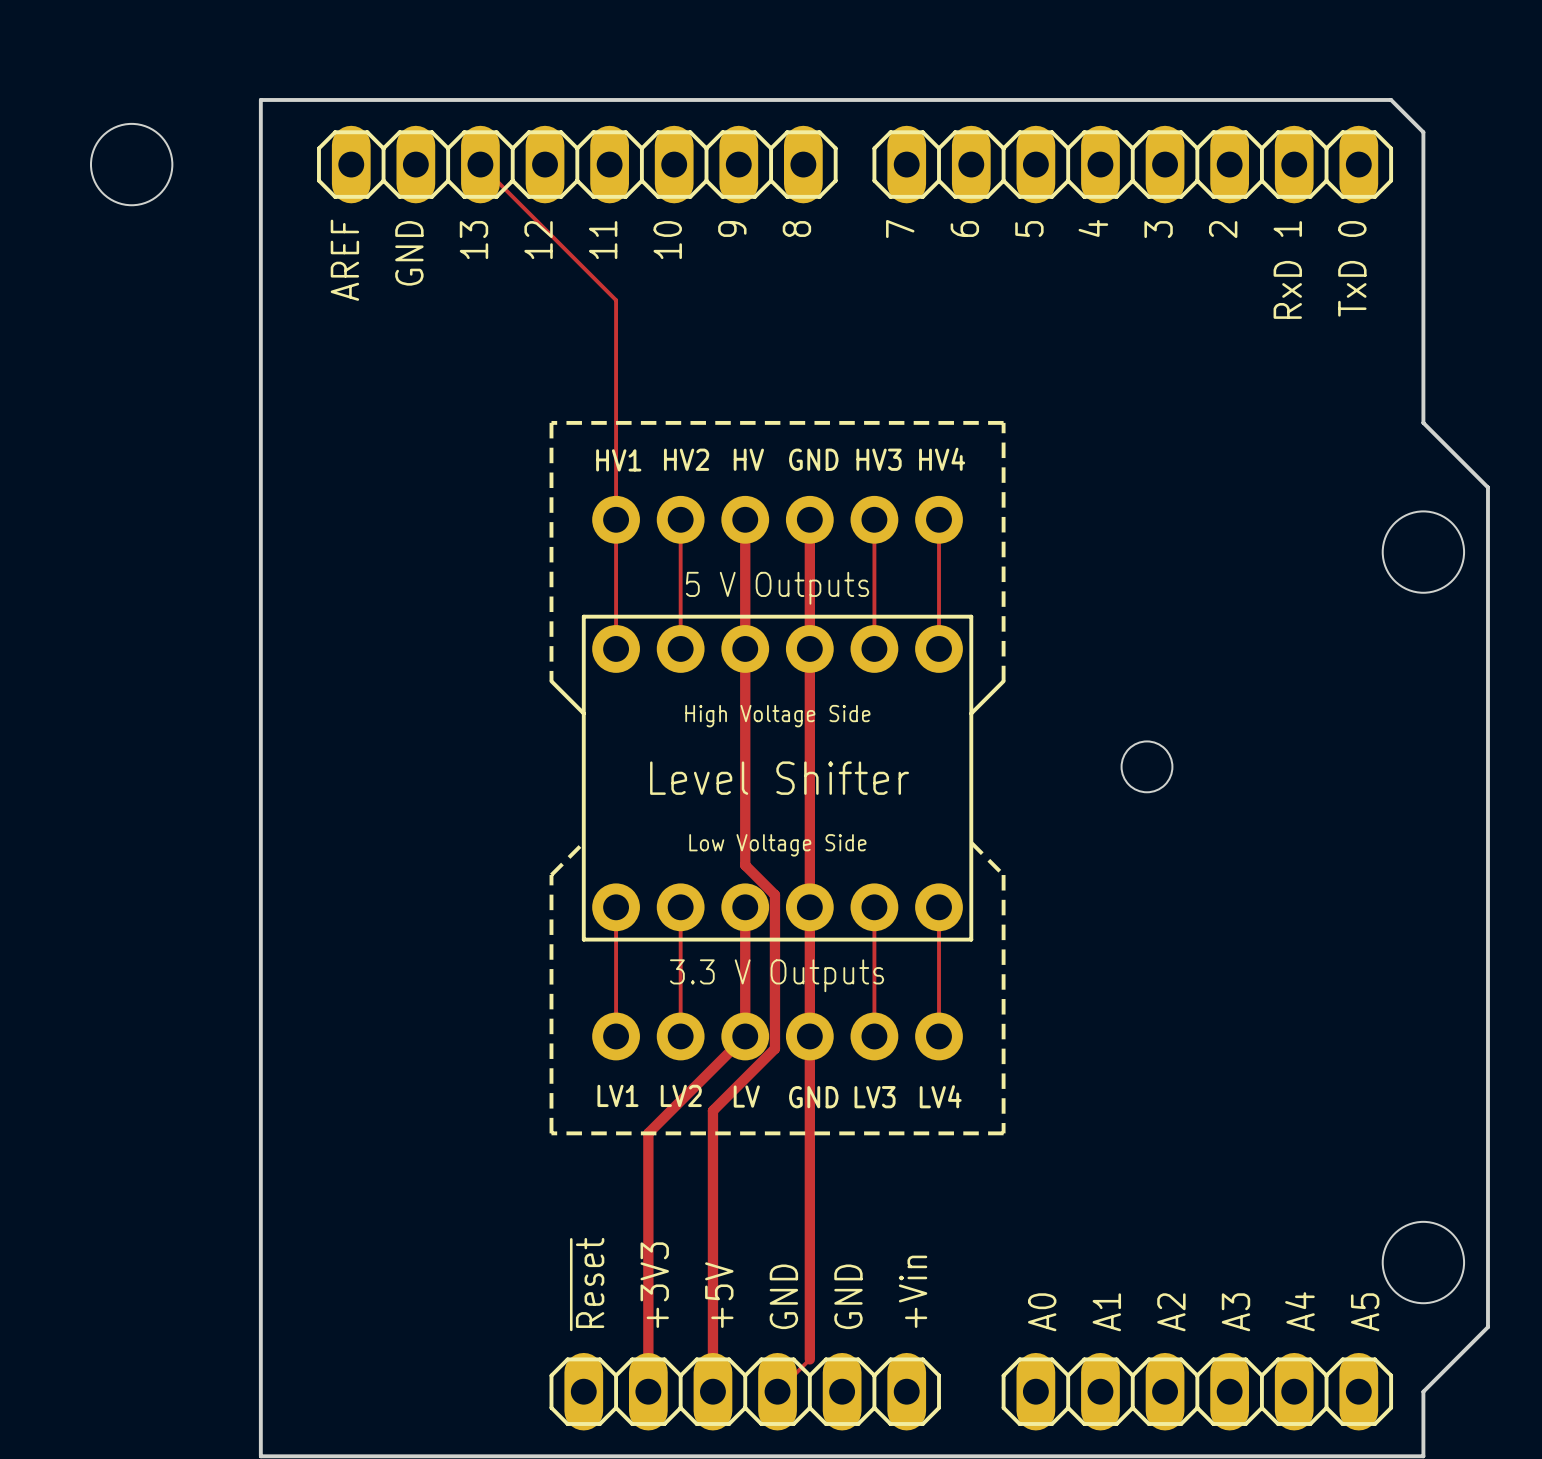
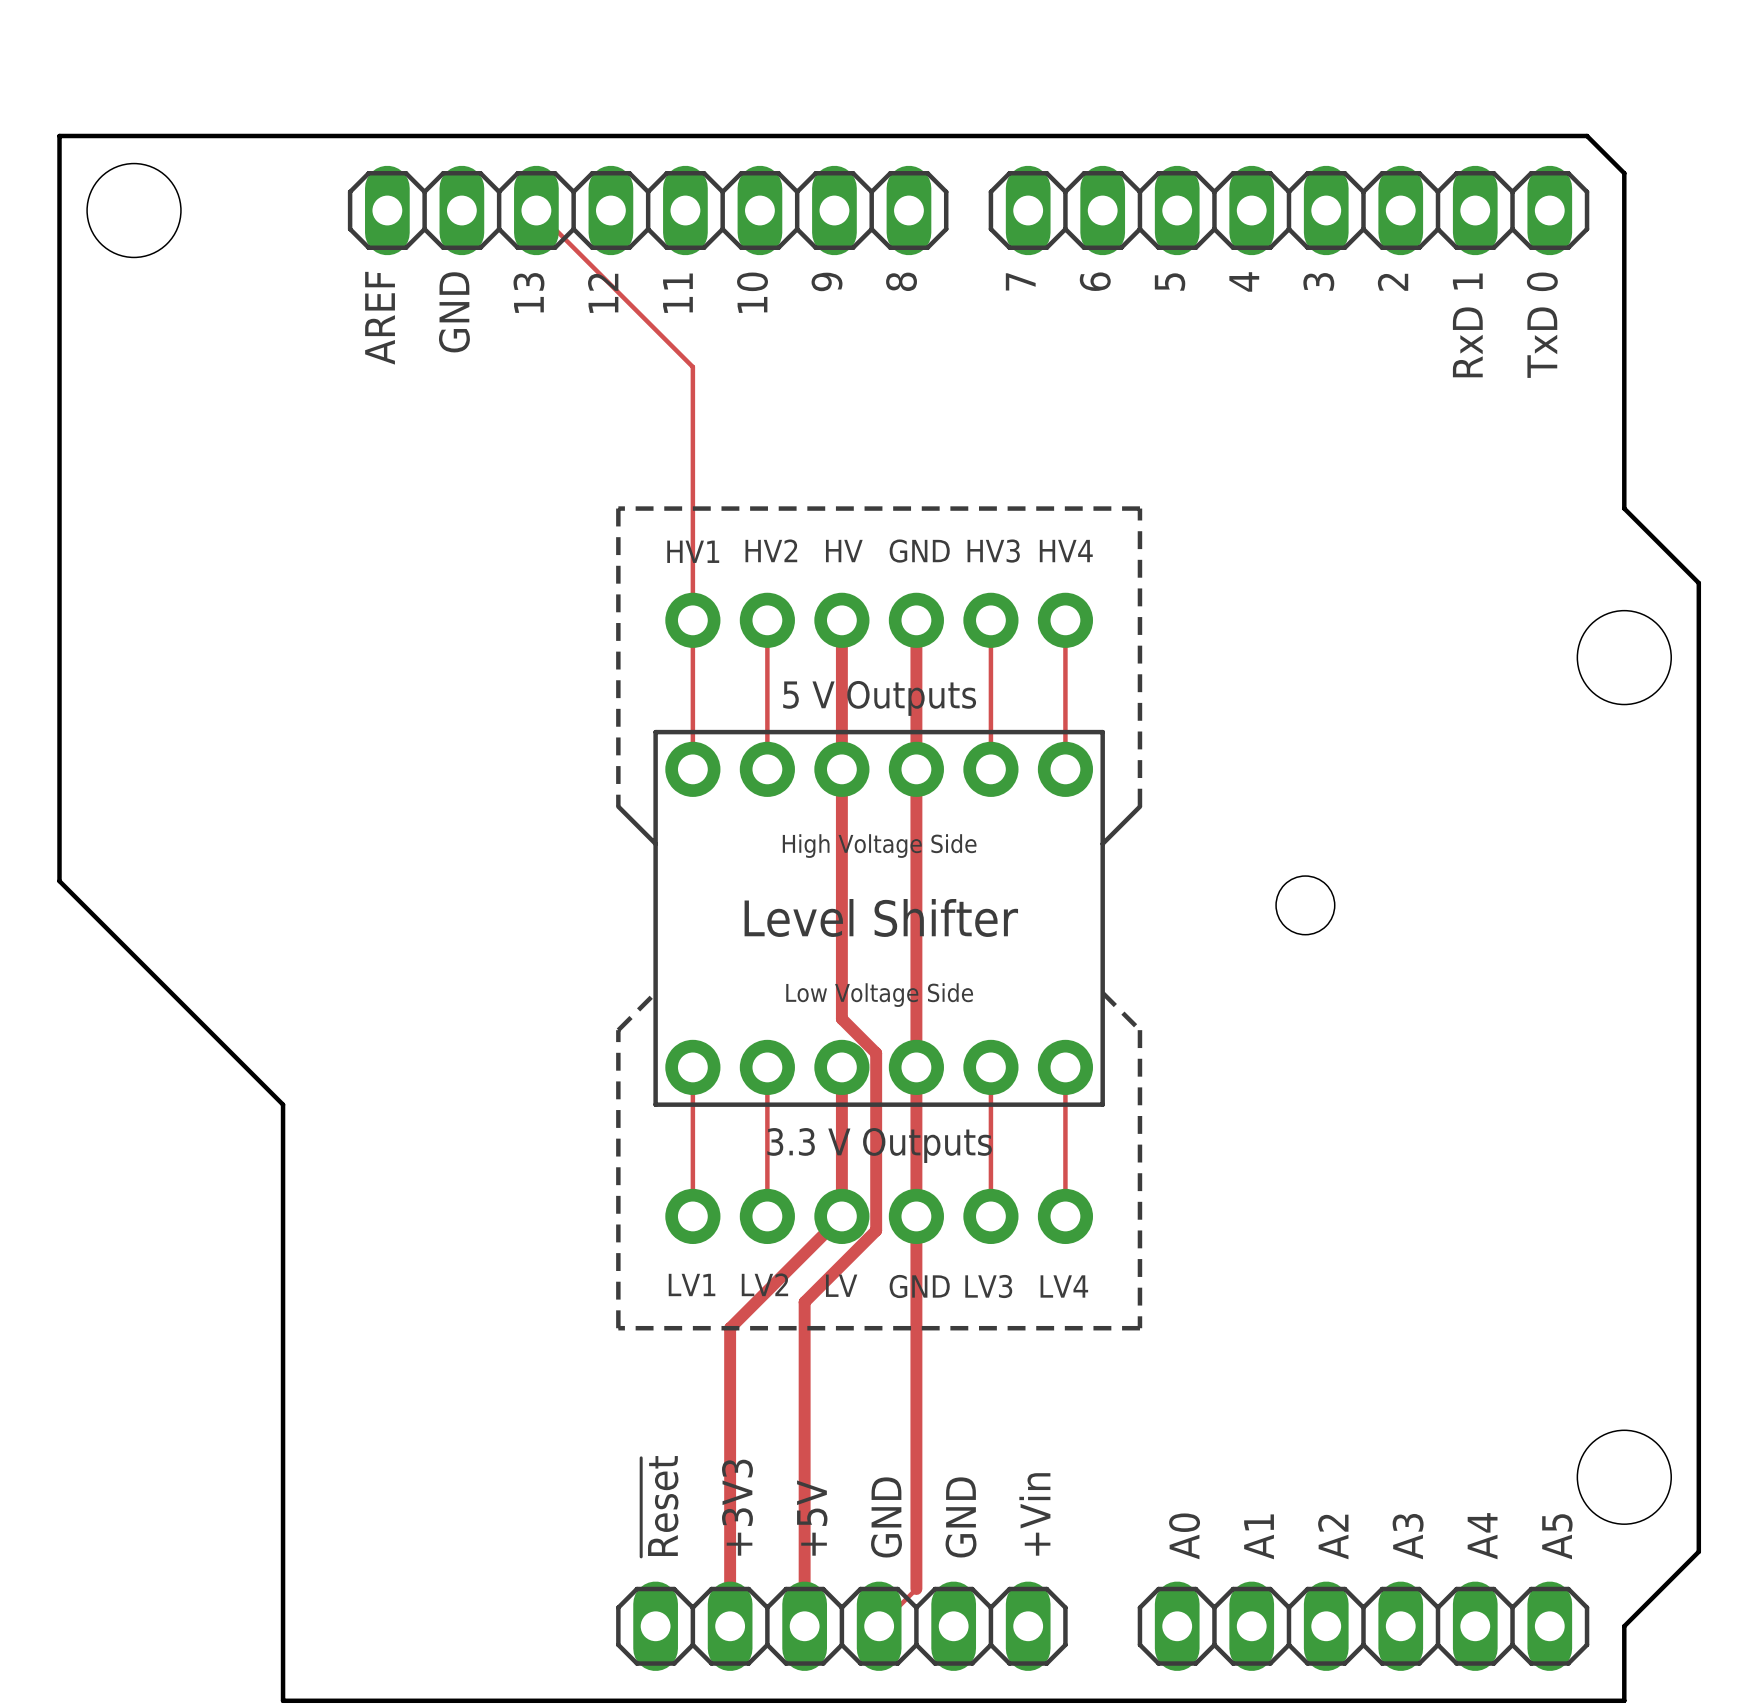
board edge: (260, 99) (260, 939) -> (283, 135) (59, 135) (59, 881) (283, 1104)

